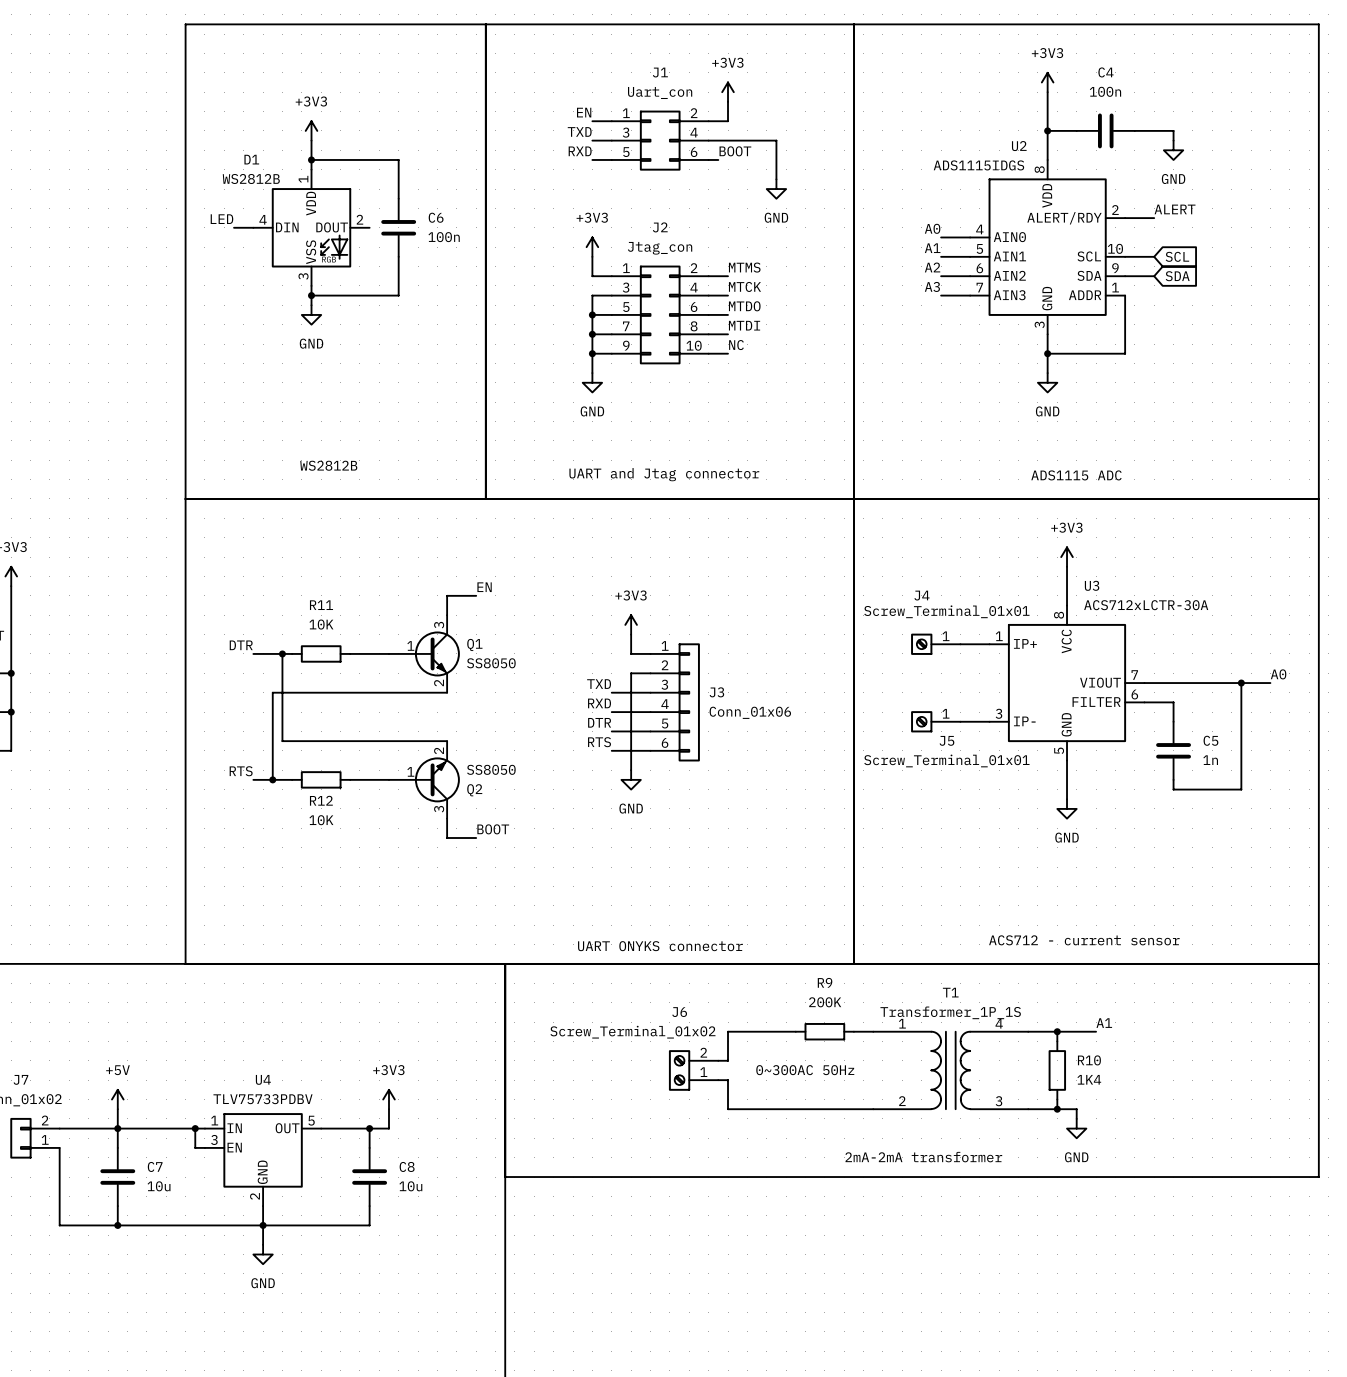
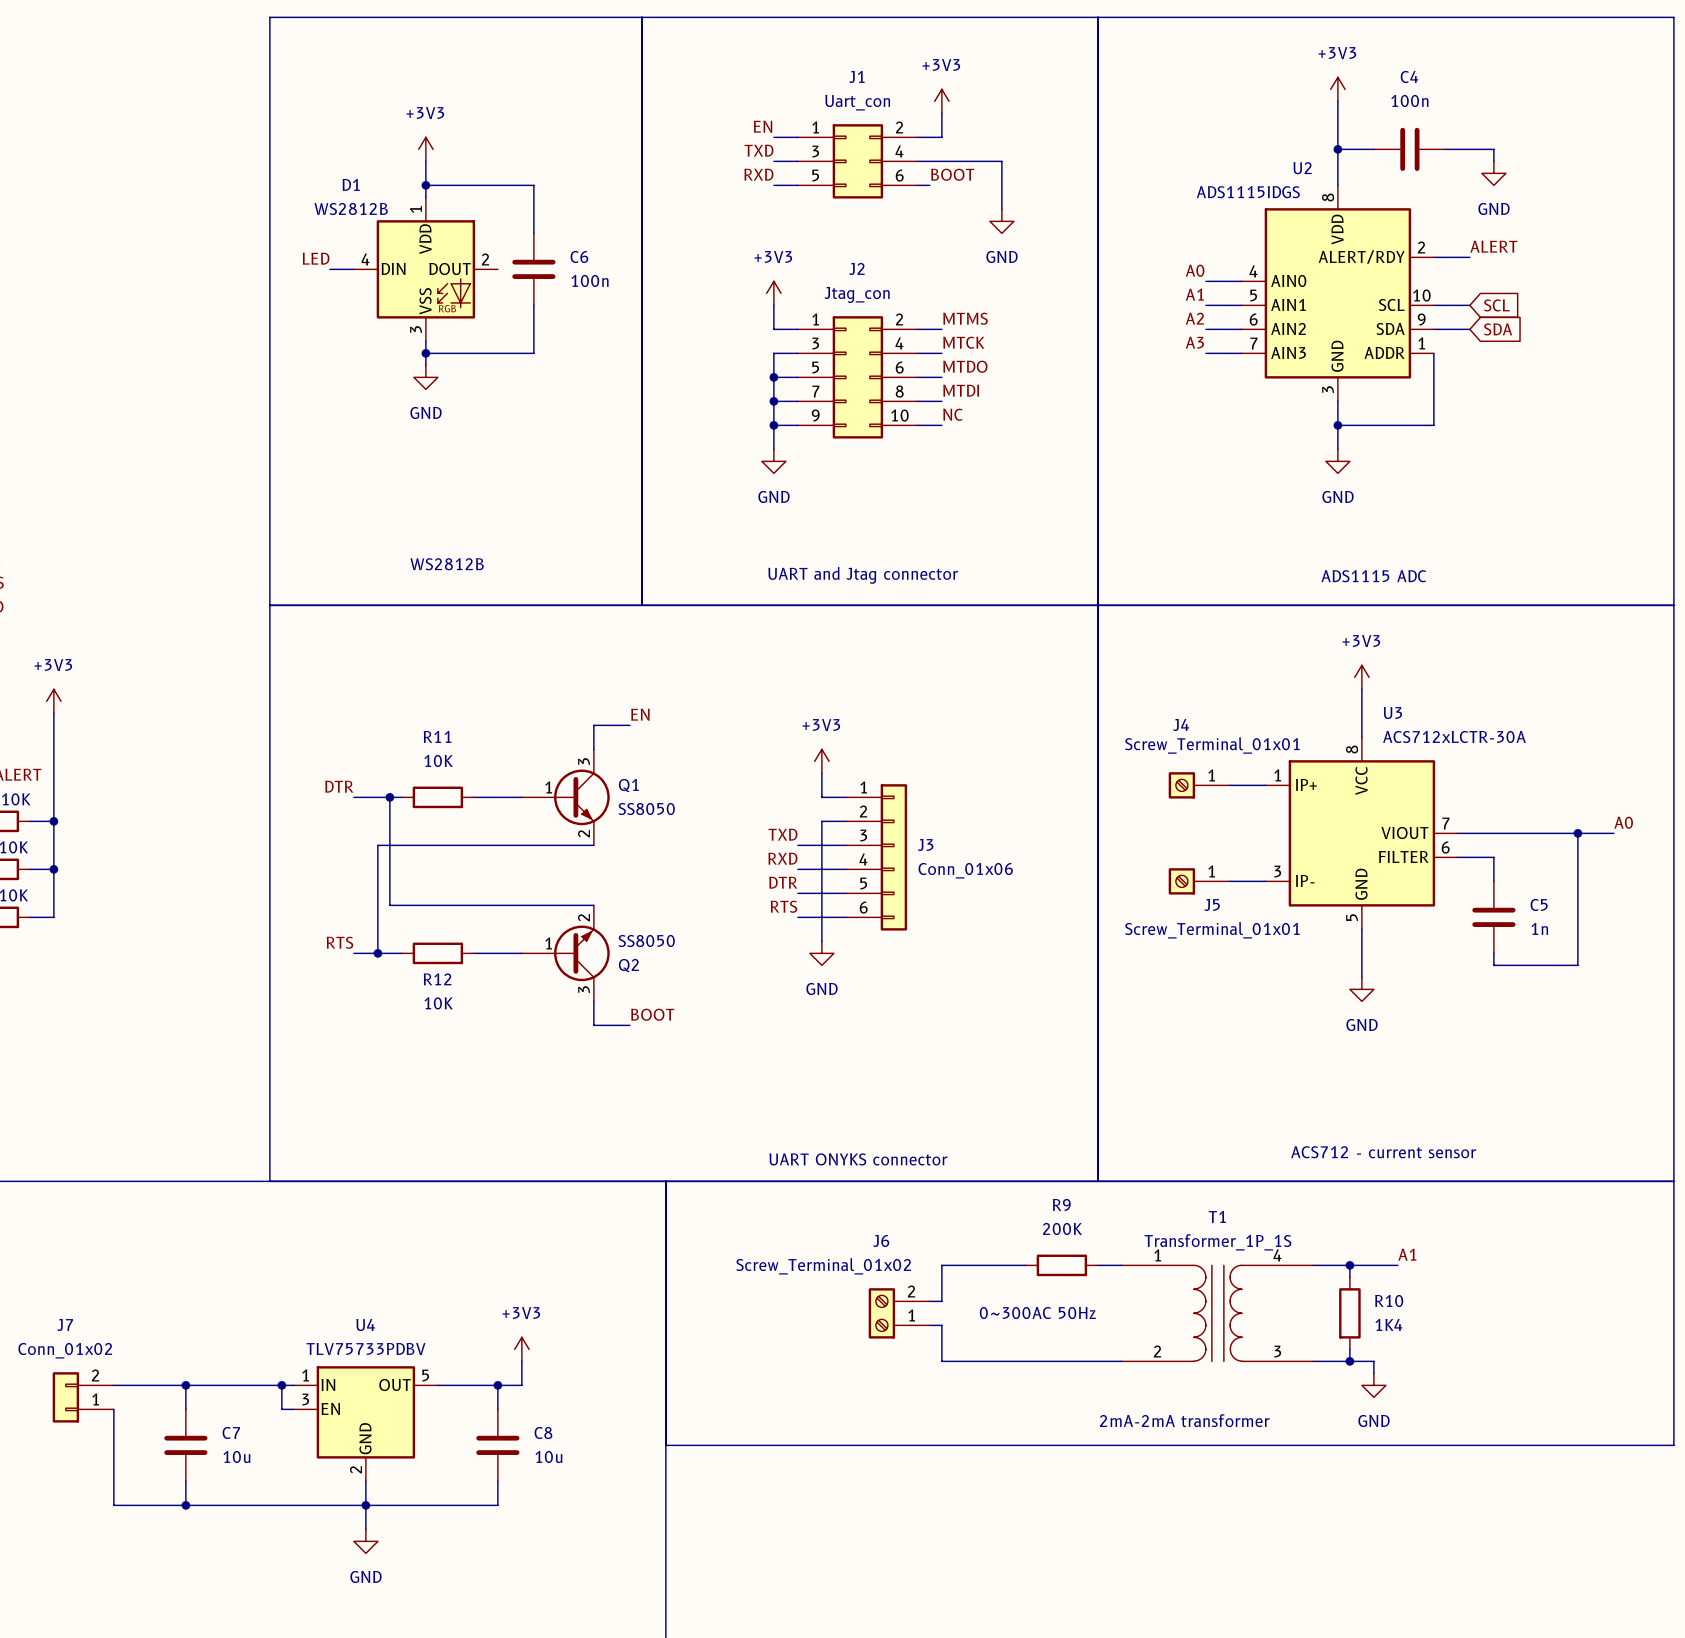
power symbol: +5V (117, 1099) -> none
wire: (117, 1109) (117, 1128) -> none

